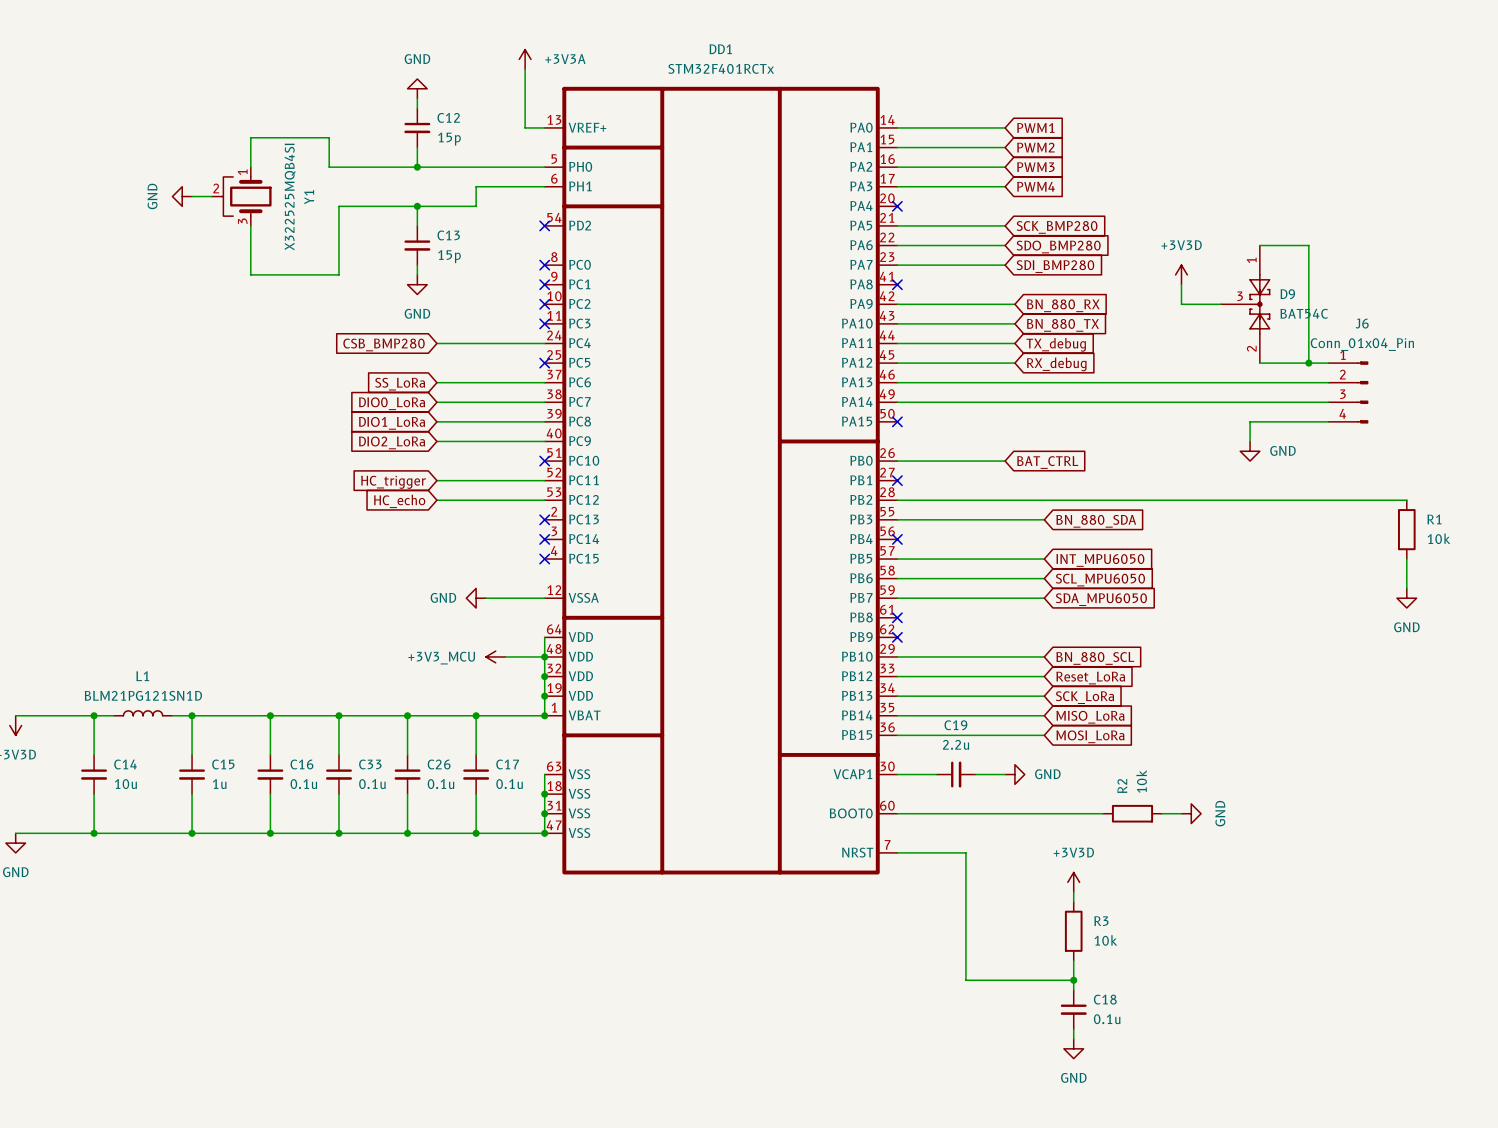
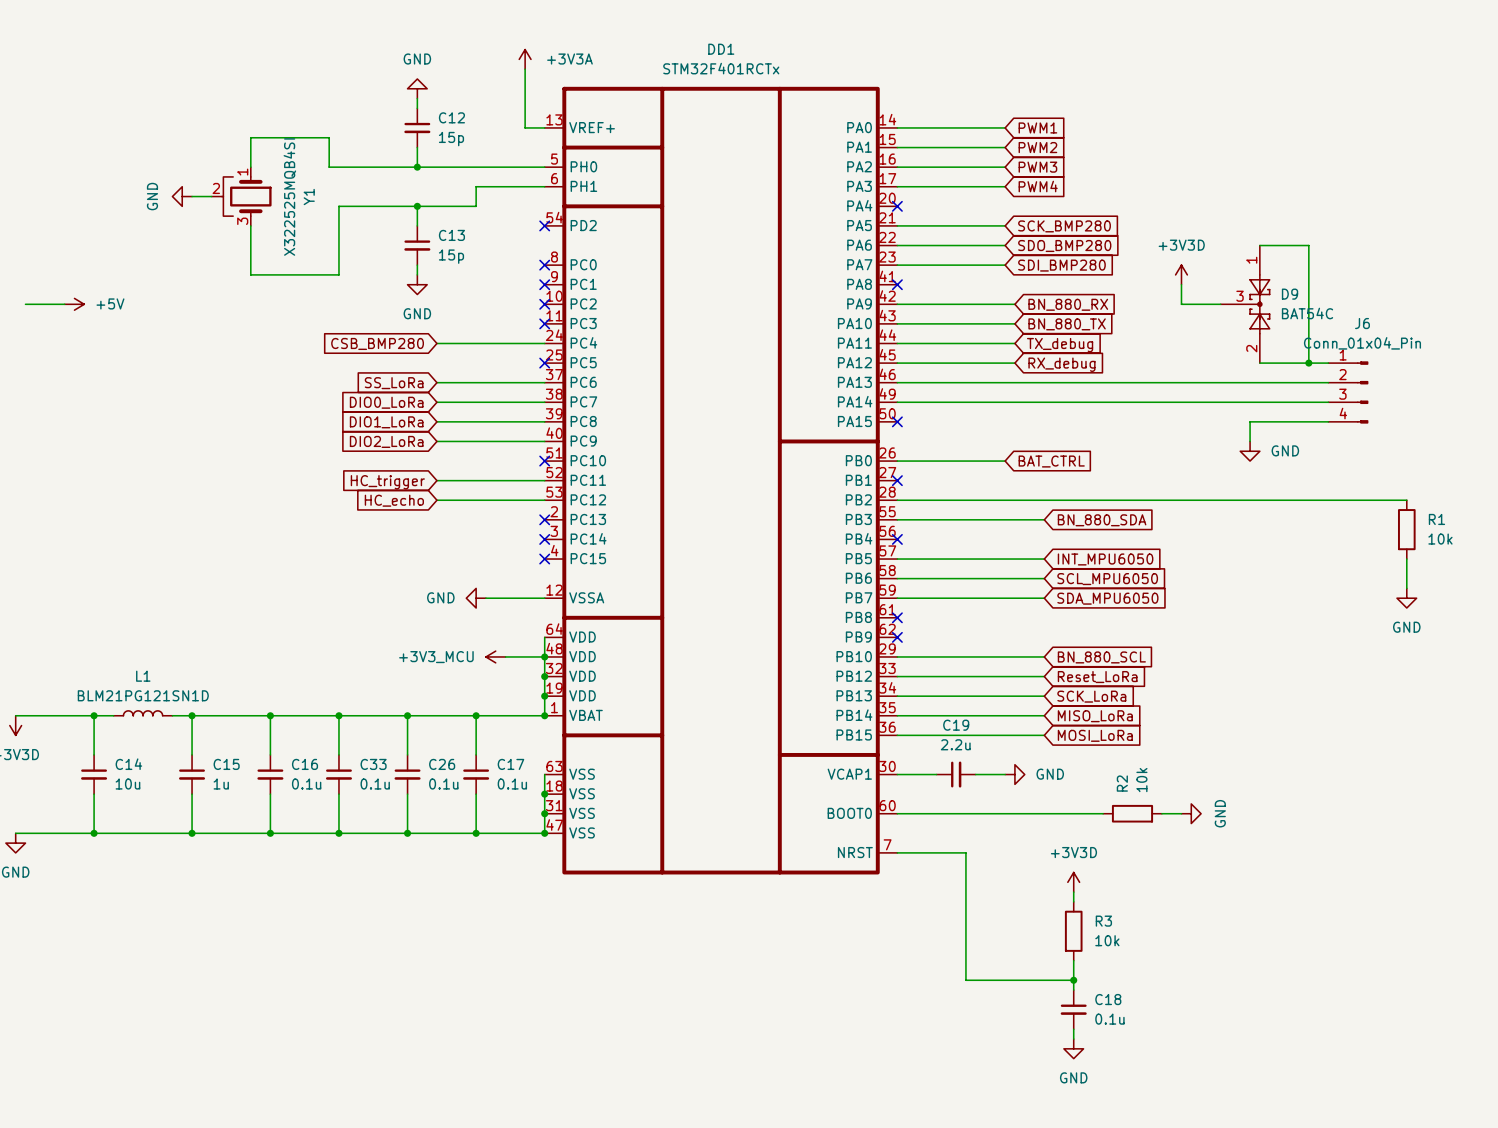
wire: none -> (25, 304) (64, 304)
power symbol: none -> +5V (74, 304)

